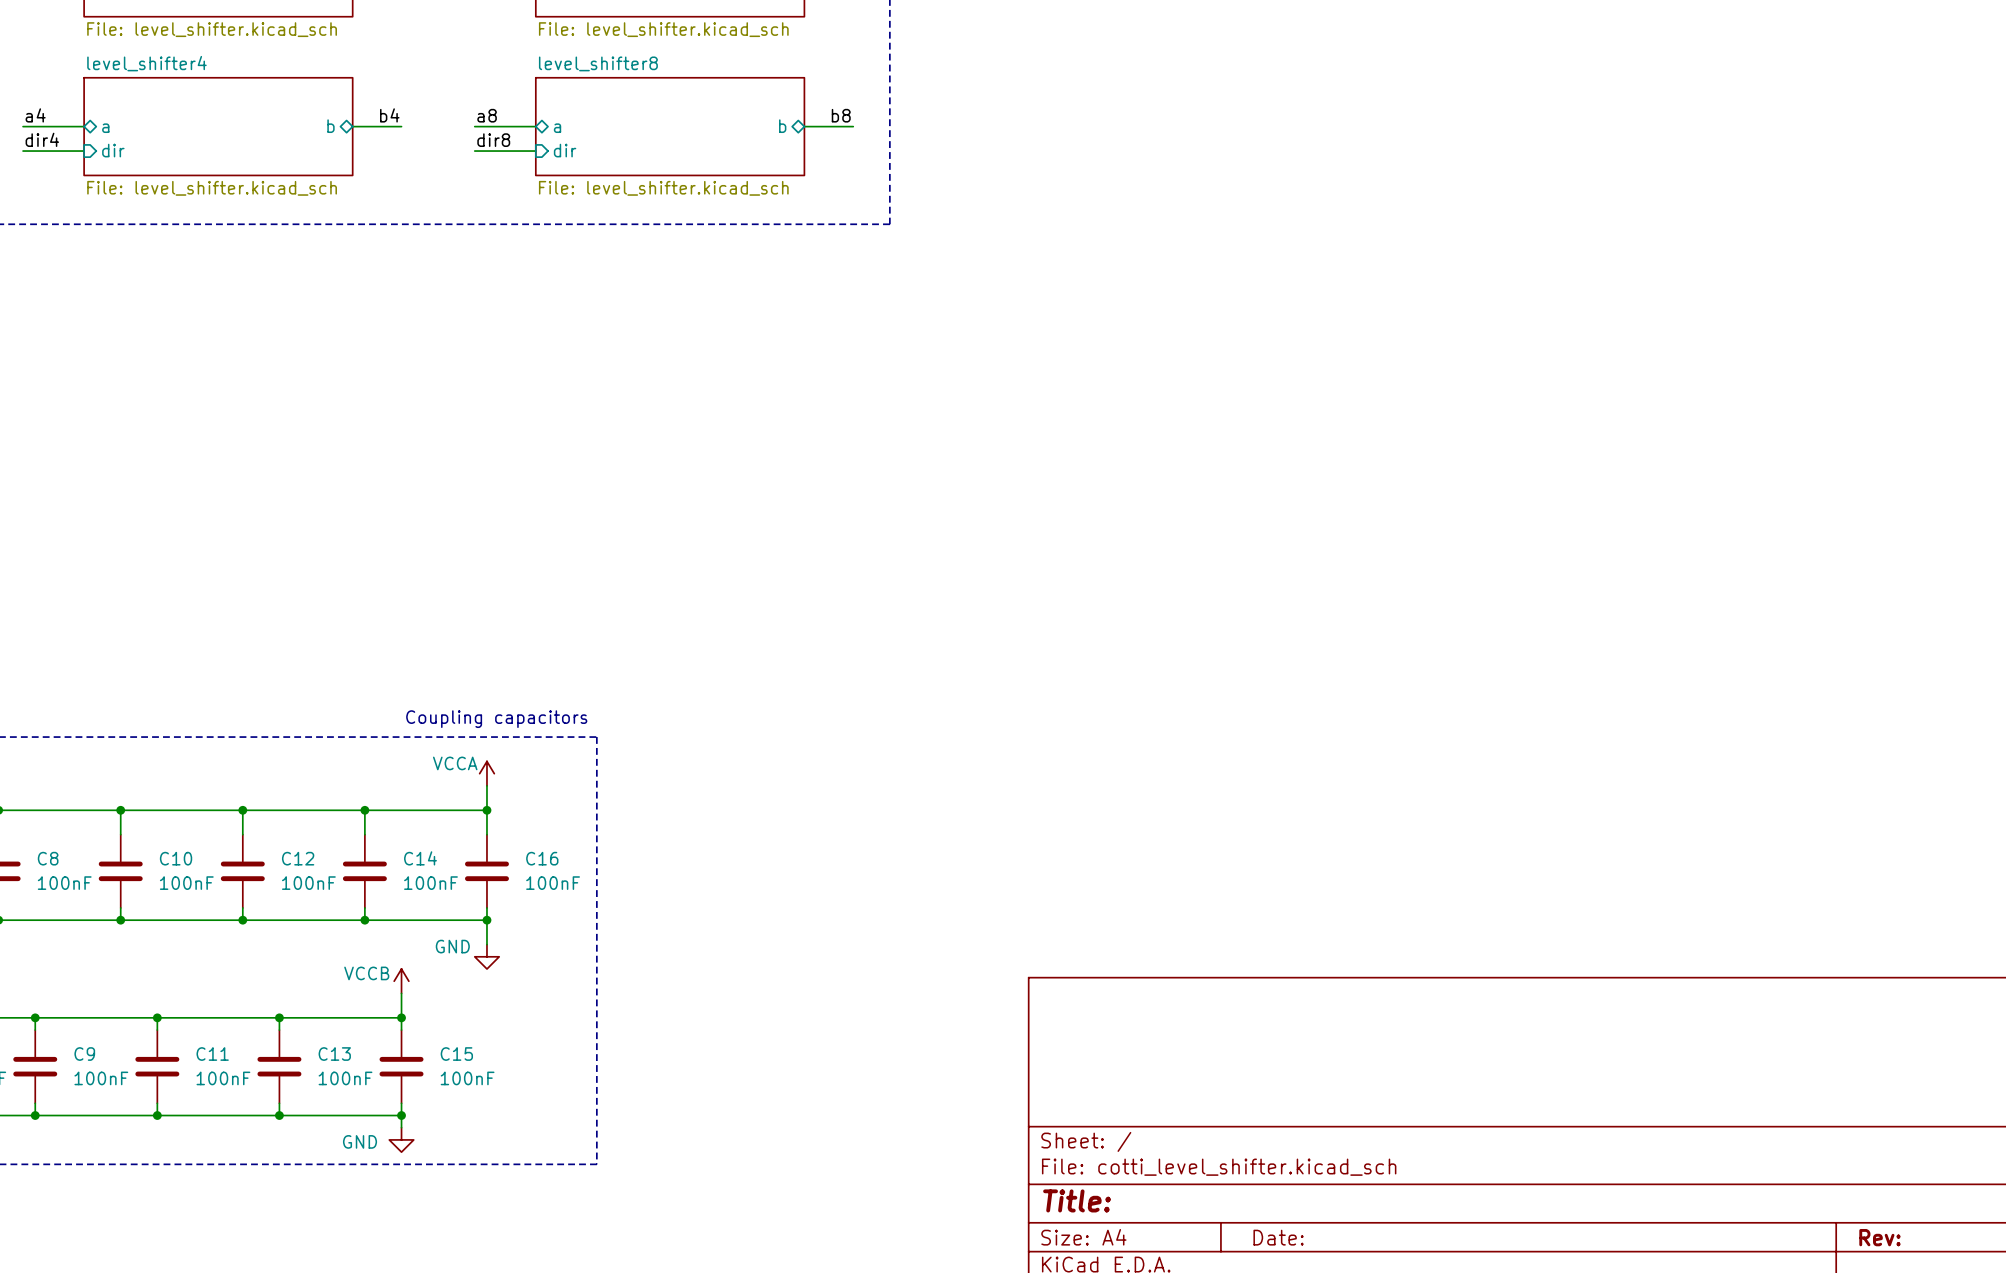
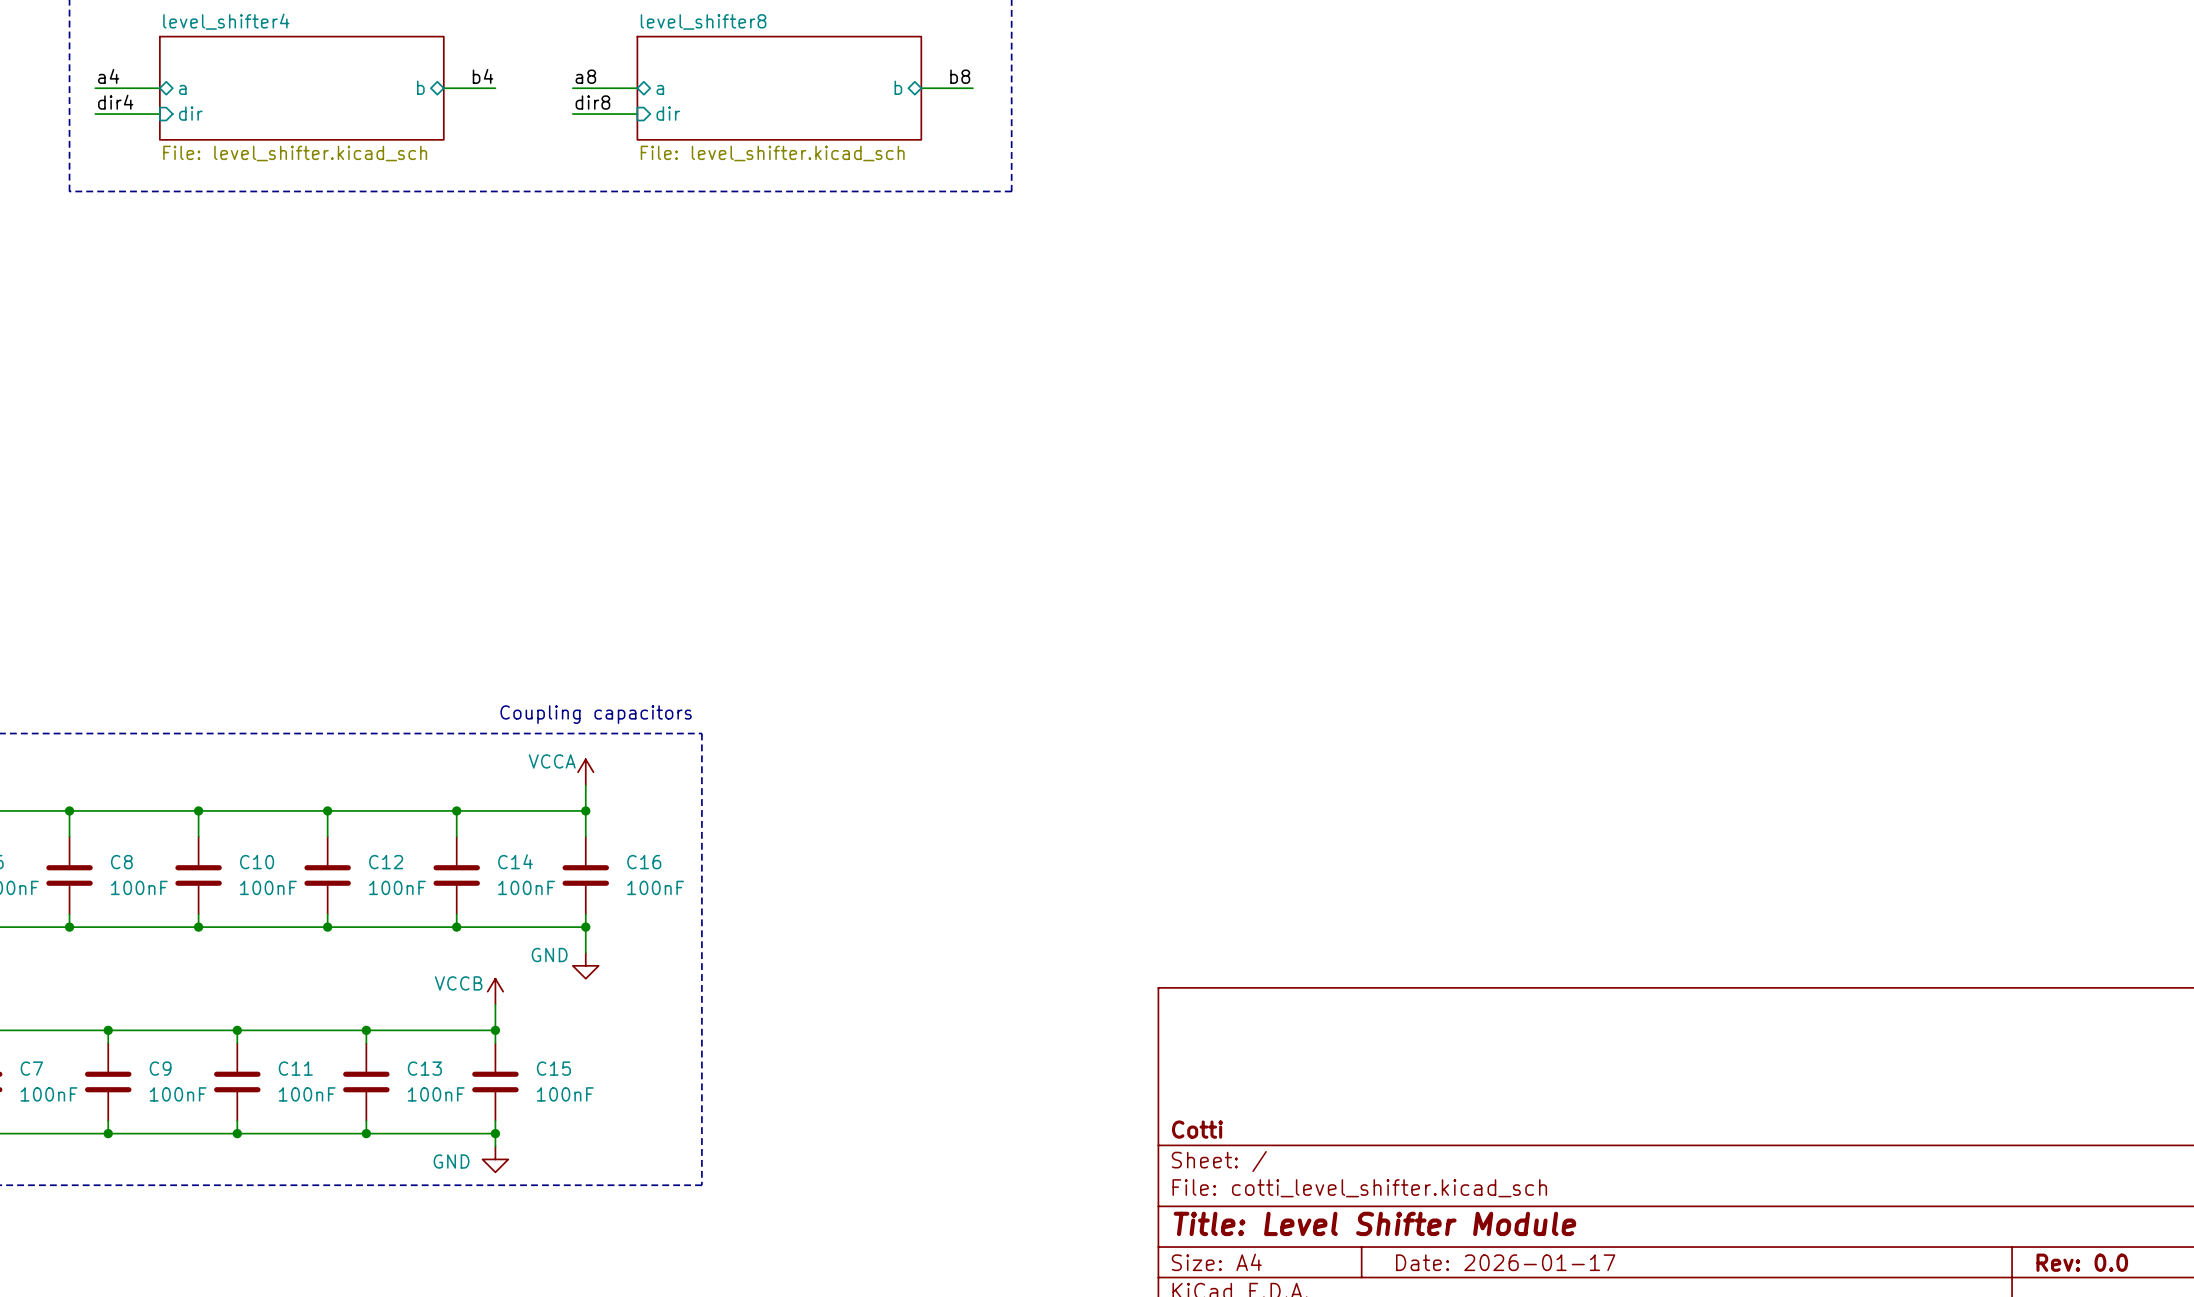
title block: none -> Cotti (1197, 1129)
title block: Title: (1077, 1200) -> Title: Level Shifter Module (1374, 1223)
title block: Date: (1278, 1237) -> Date: 2026-01-17 (1505, 1262)
title block: Rev: (1879, 1237) -> Rev: 0.0 (2082, 1262)

